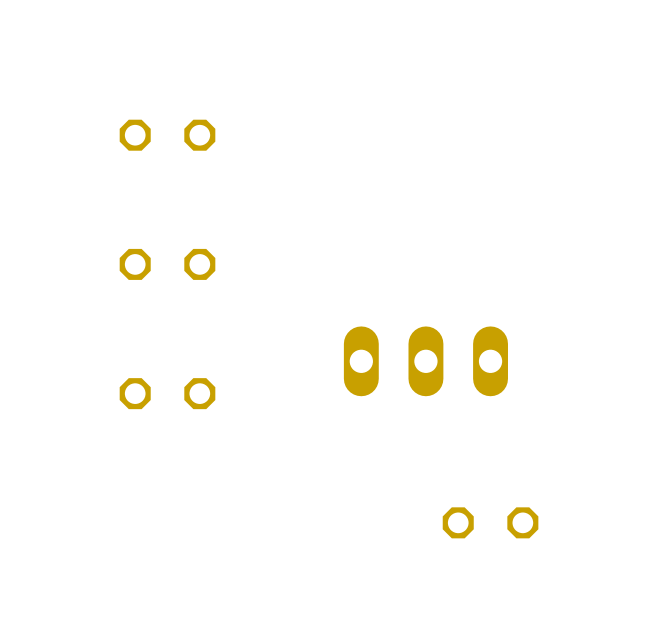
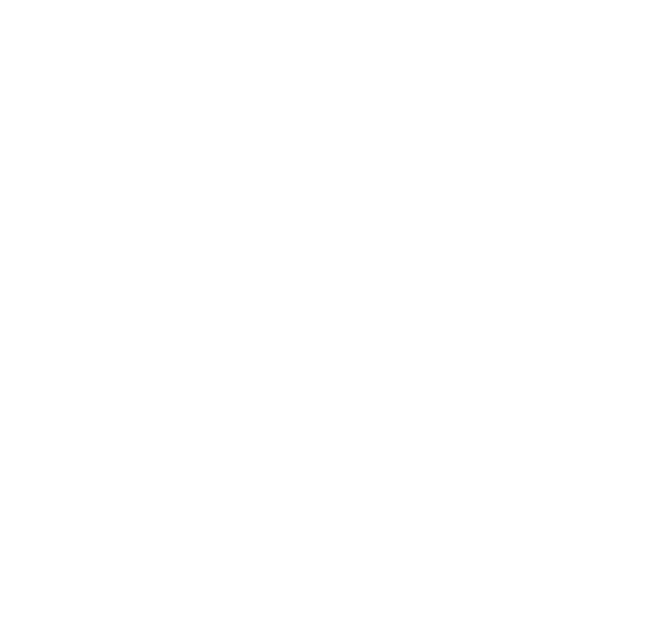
part: (167, 135) -> none
part: (167, 264) -> none
part: (425, 361) -> none
part: (167, 393) -> none
part: (490, 522) -> none

